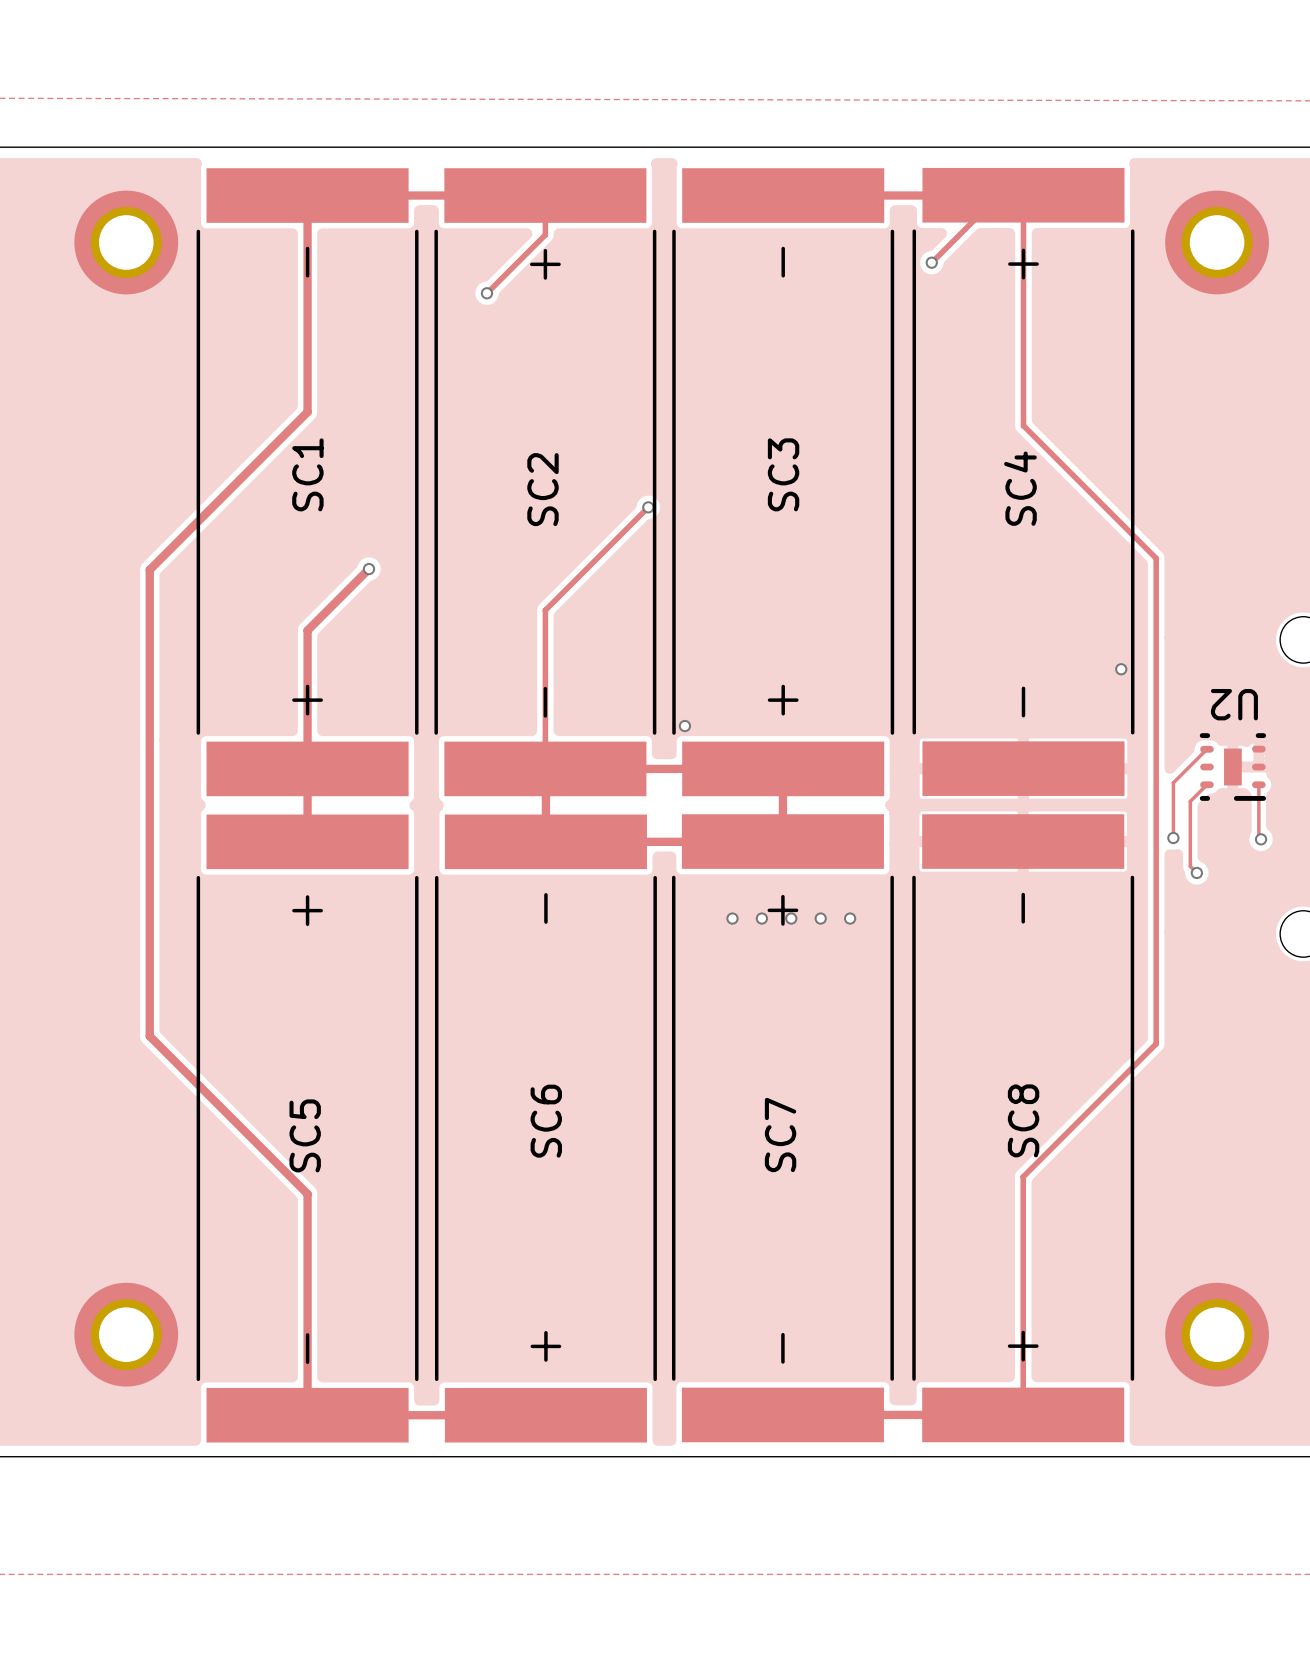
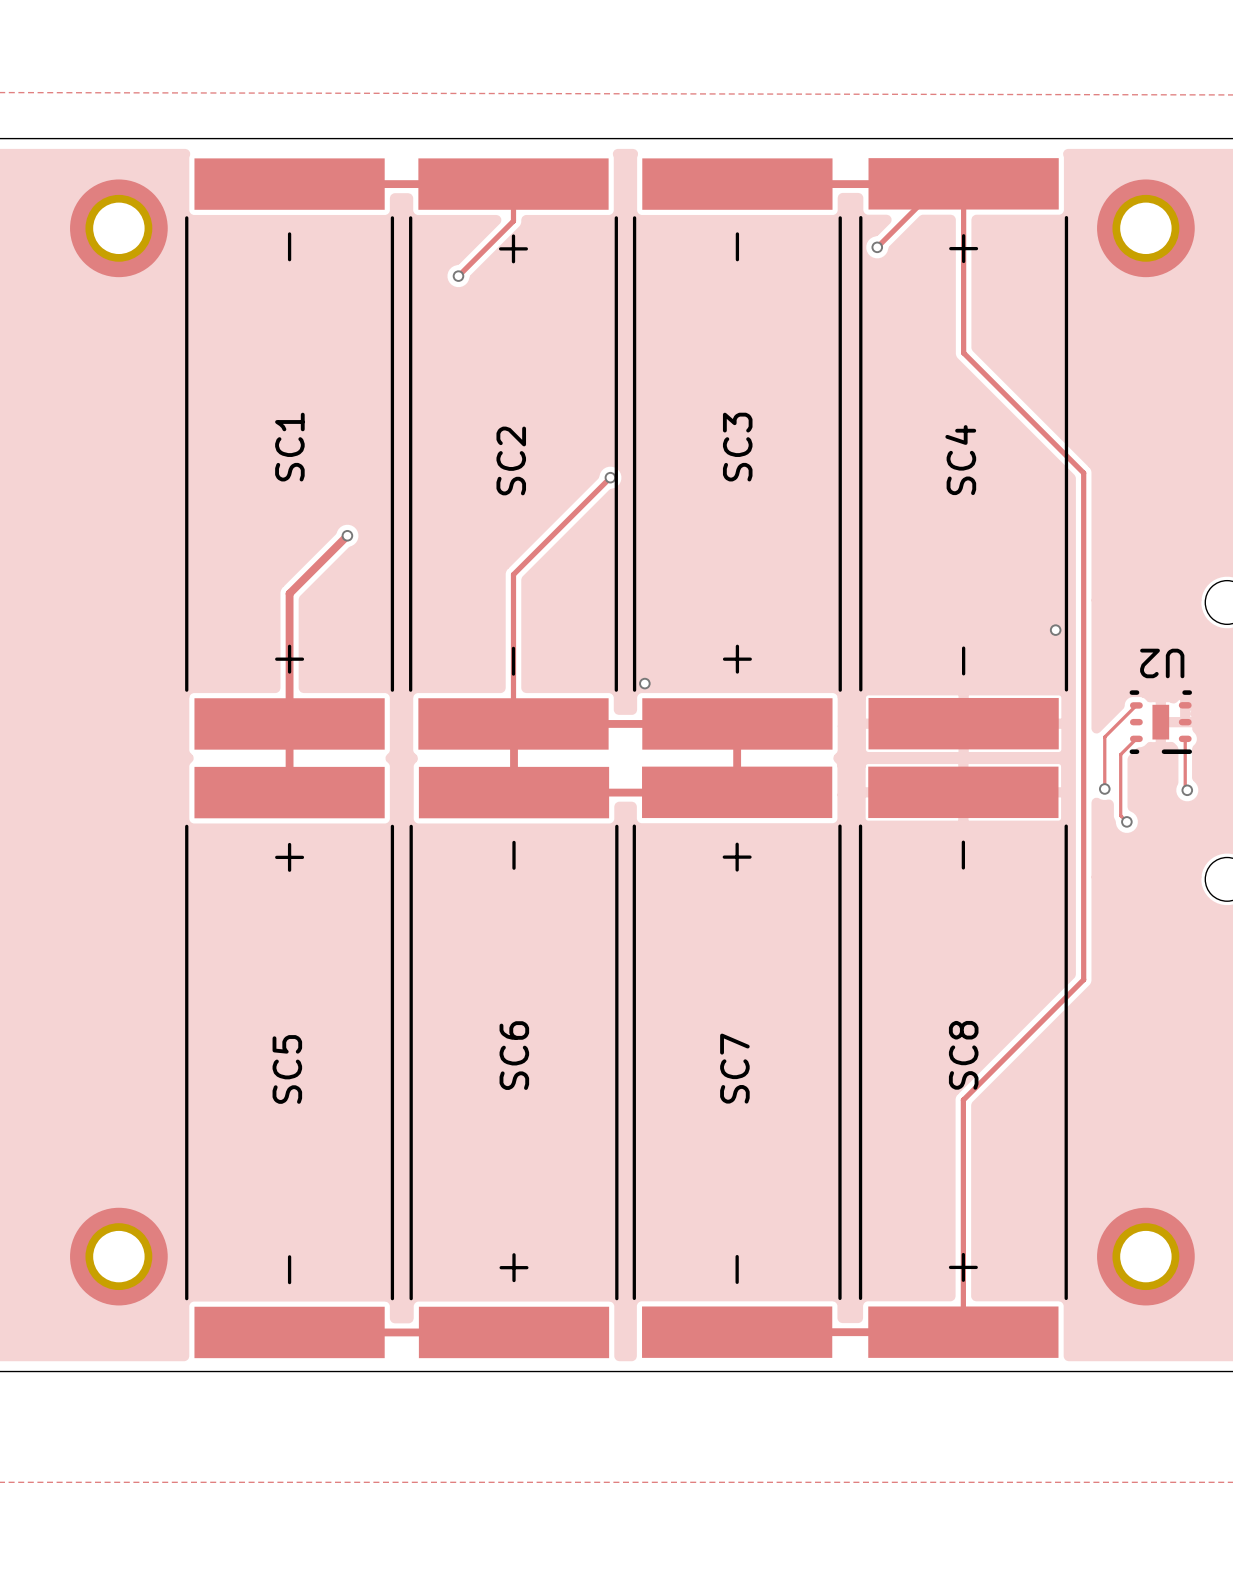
track: (307, 195) (307, 412) (149, 569) (149, 1036) (307, 1194) (307, 1415) -> none
track: (1023, 374) (1023, 425) (1156, 558) (1156, 1043) (1023, 1176) -> (963, 352) (1083, 473) (1083, 979) (963, 1100) (963, 1108)
via: (732, 918) -> none
via: (761, 918) -> none
via: (791, 918) -> none
via: (820, 918) -> none
via: (850, 918) -> none

